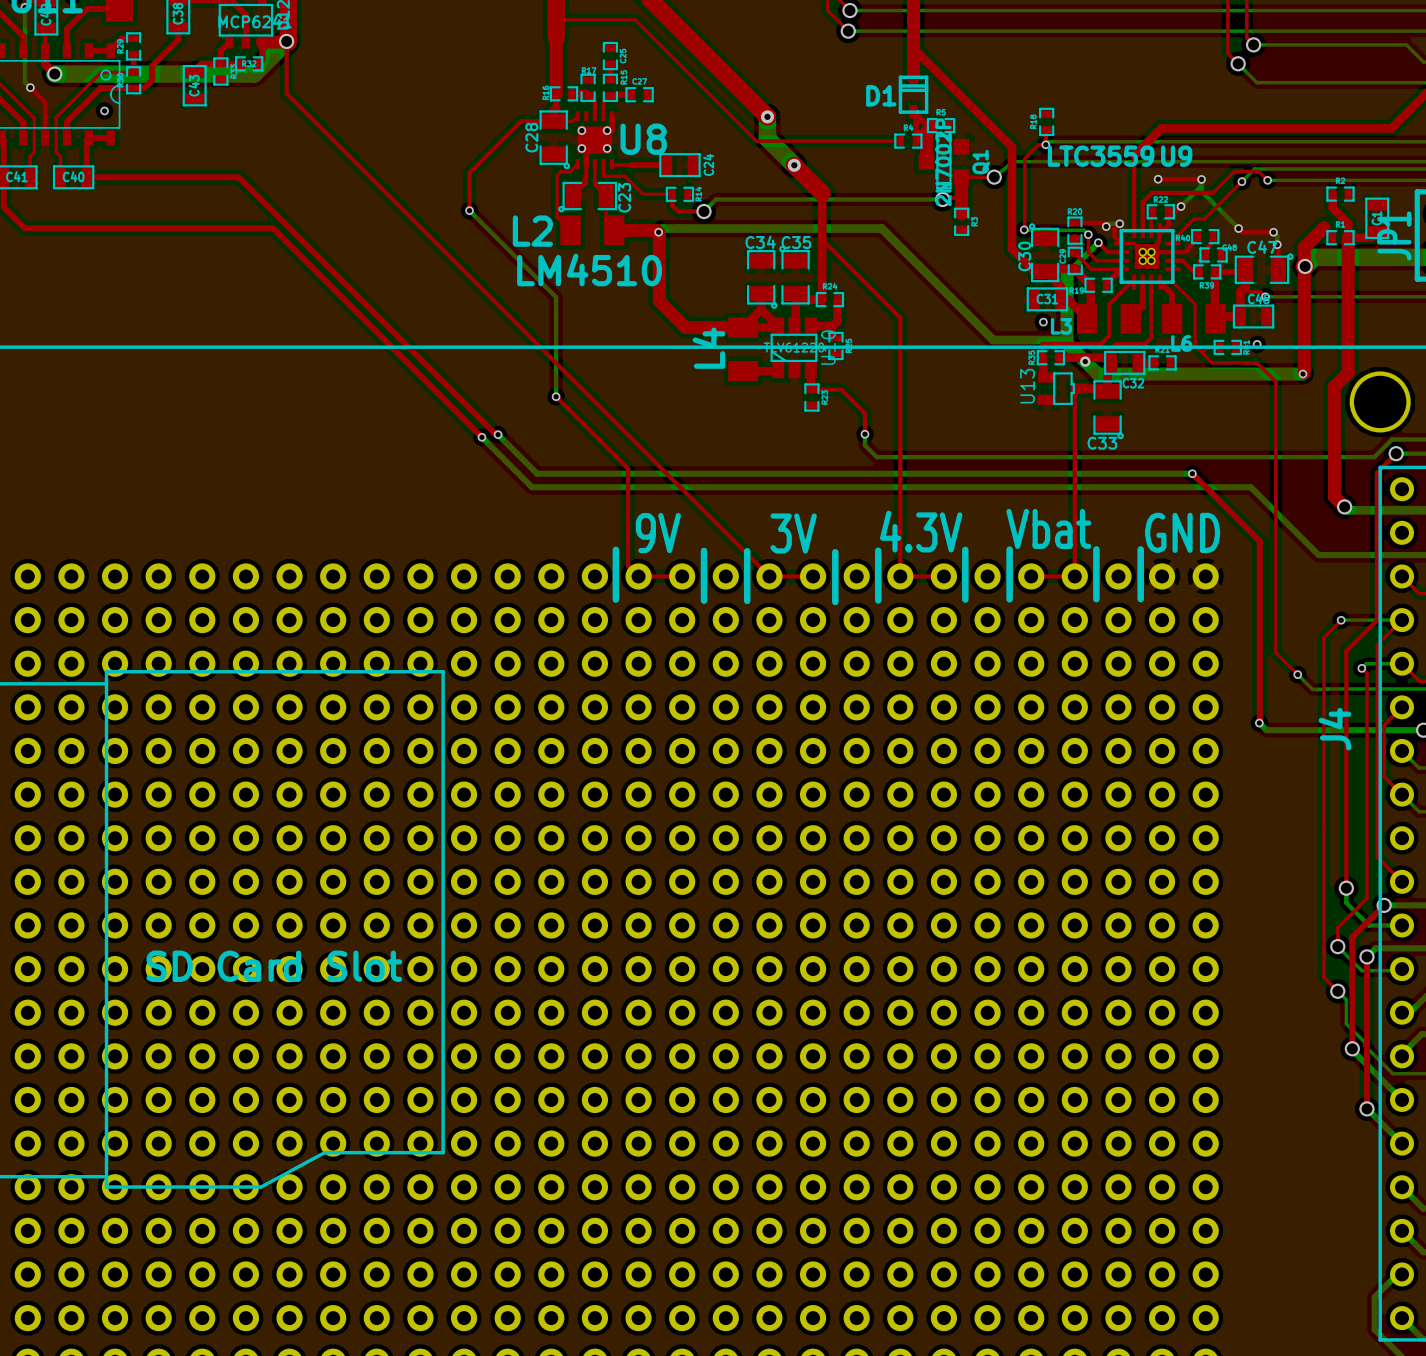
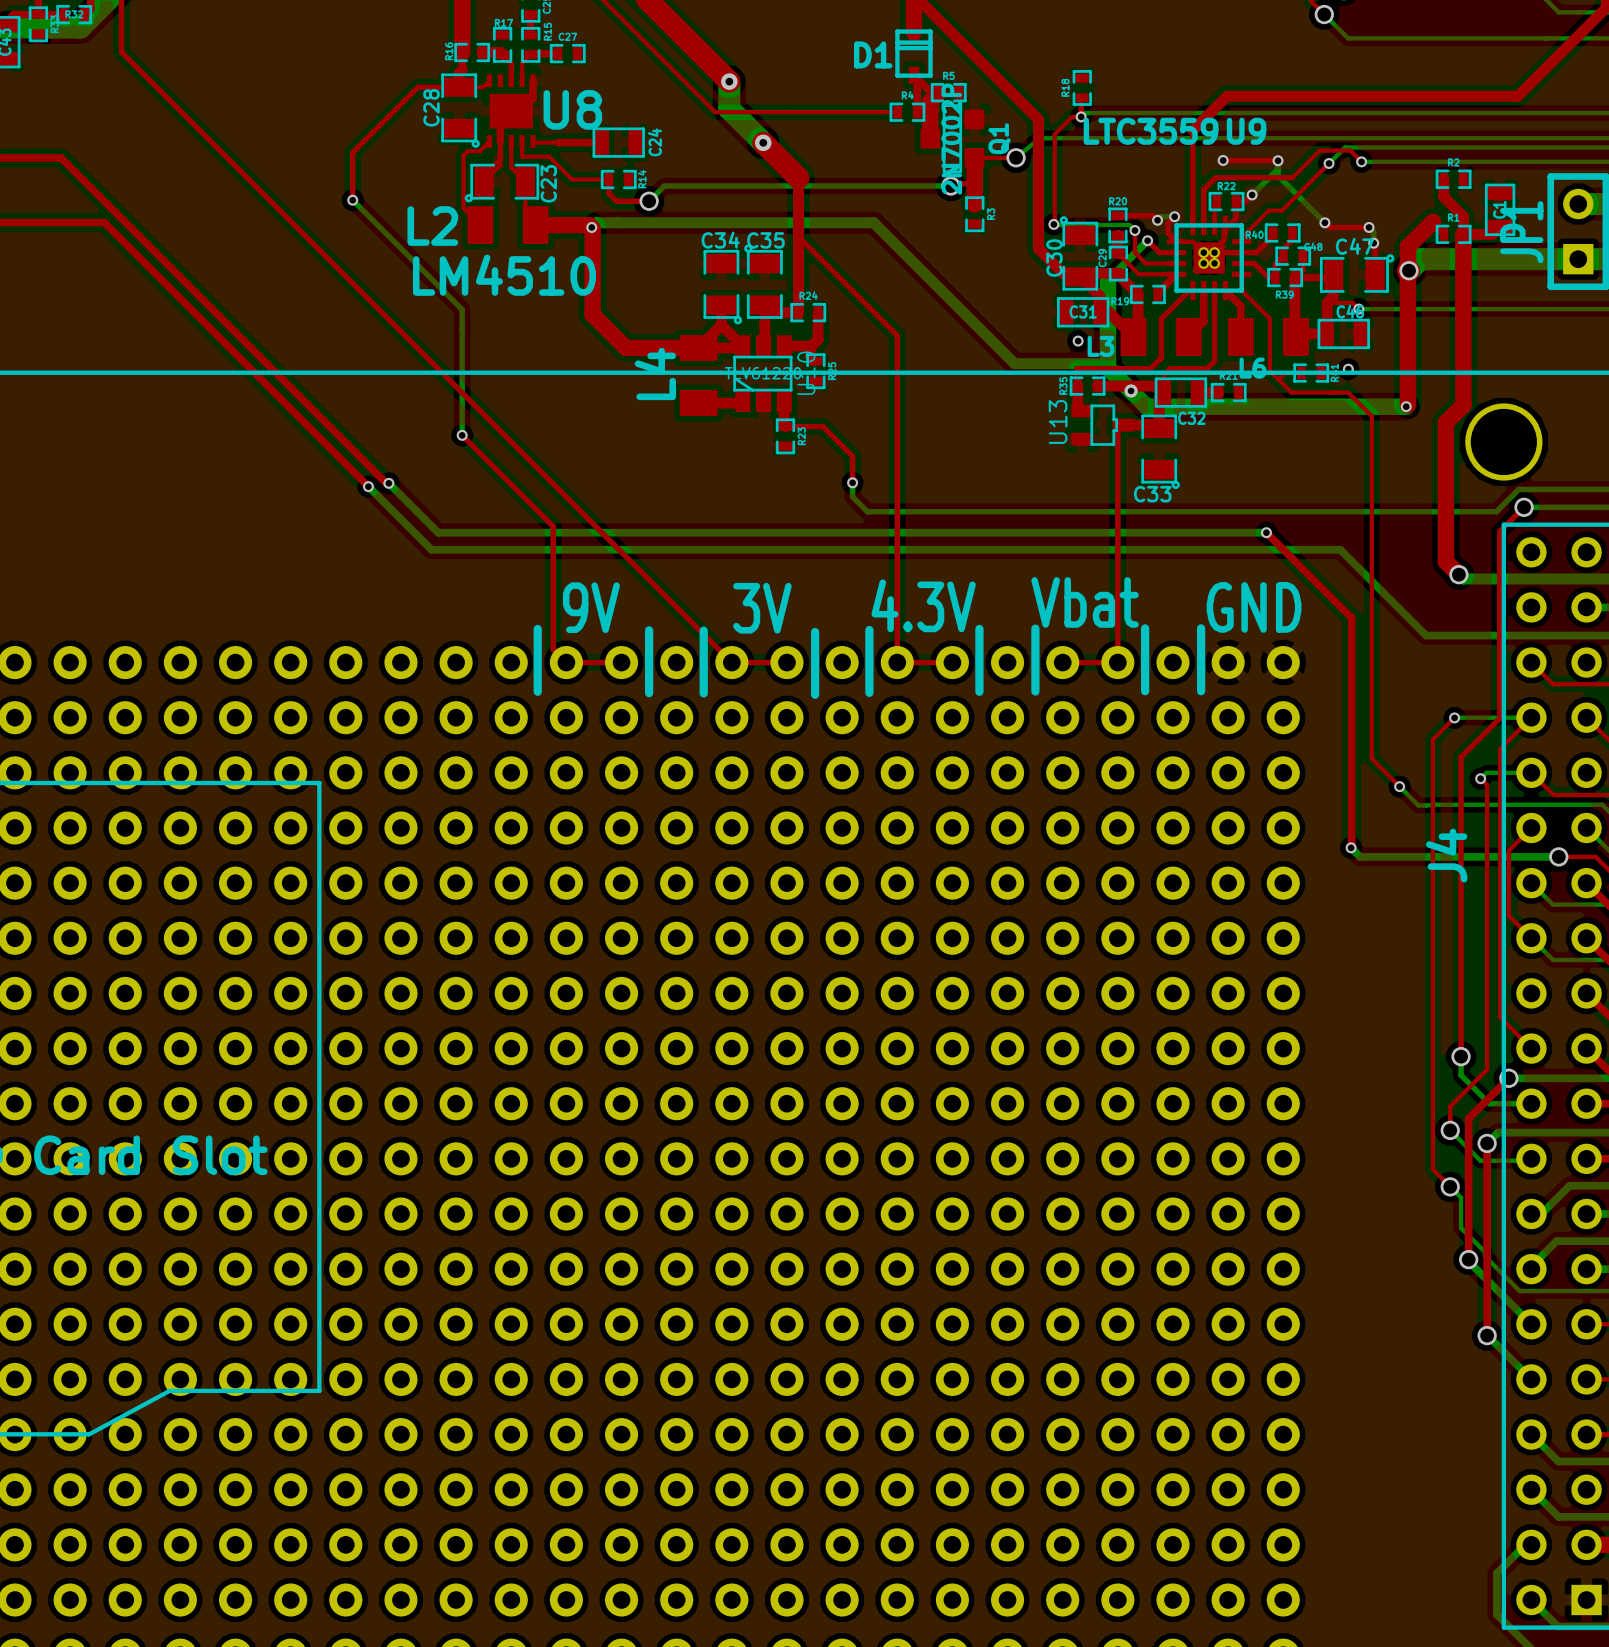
via: (581, 130) -> none
via: (607, 130) -> none
via: (581, 148) -> none
via: (607, 148) -> none

